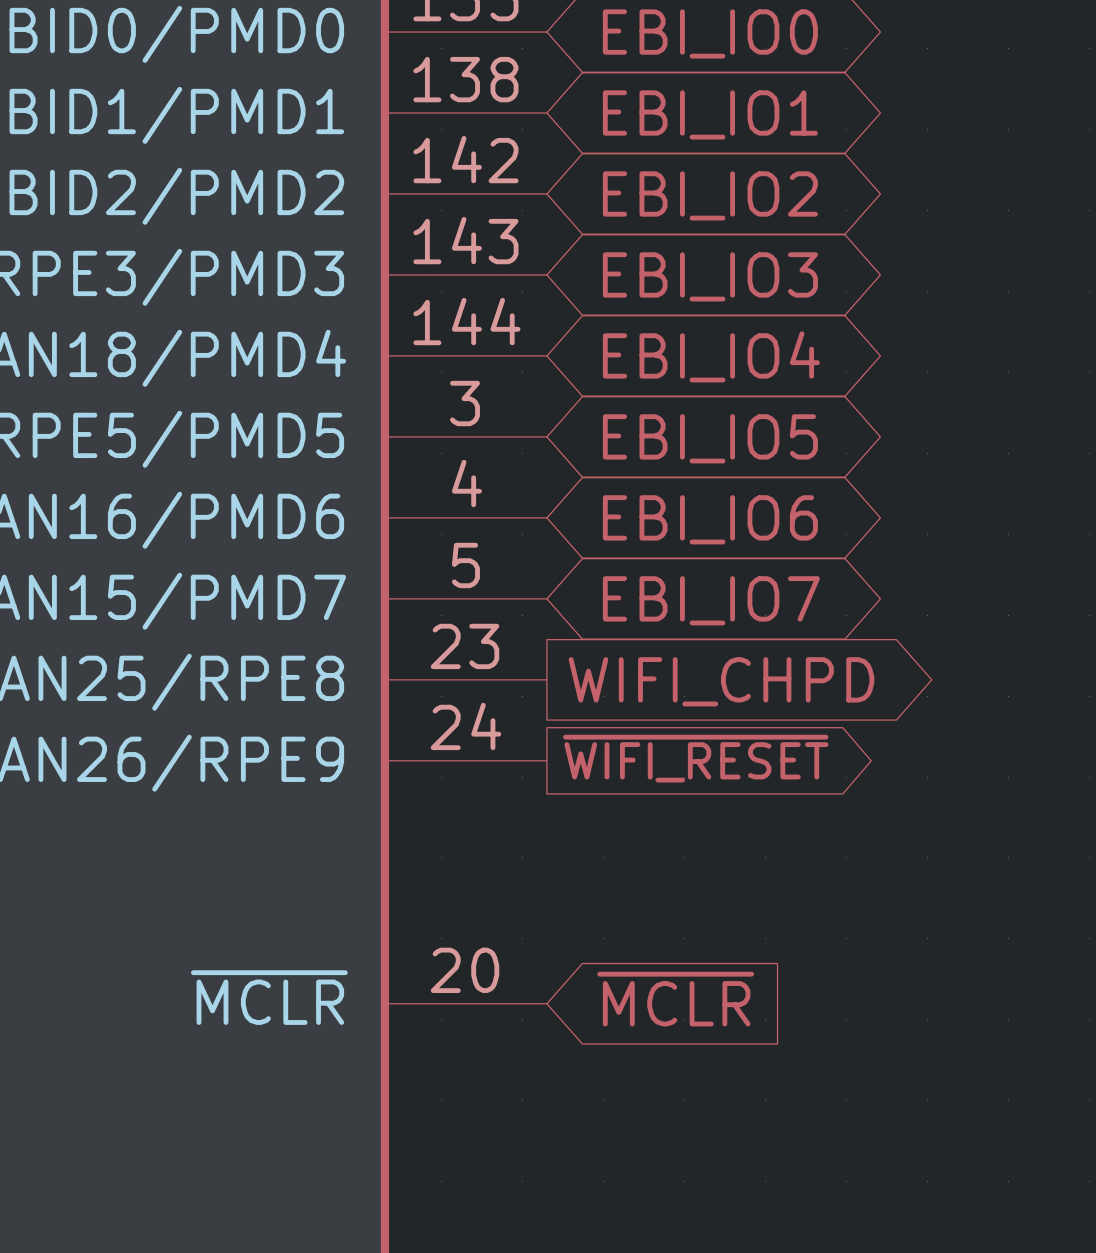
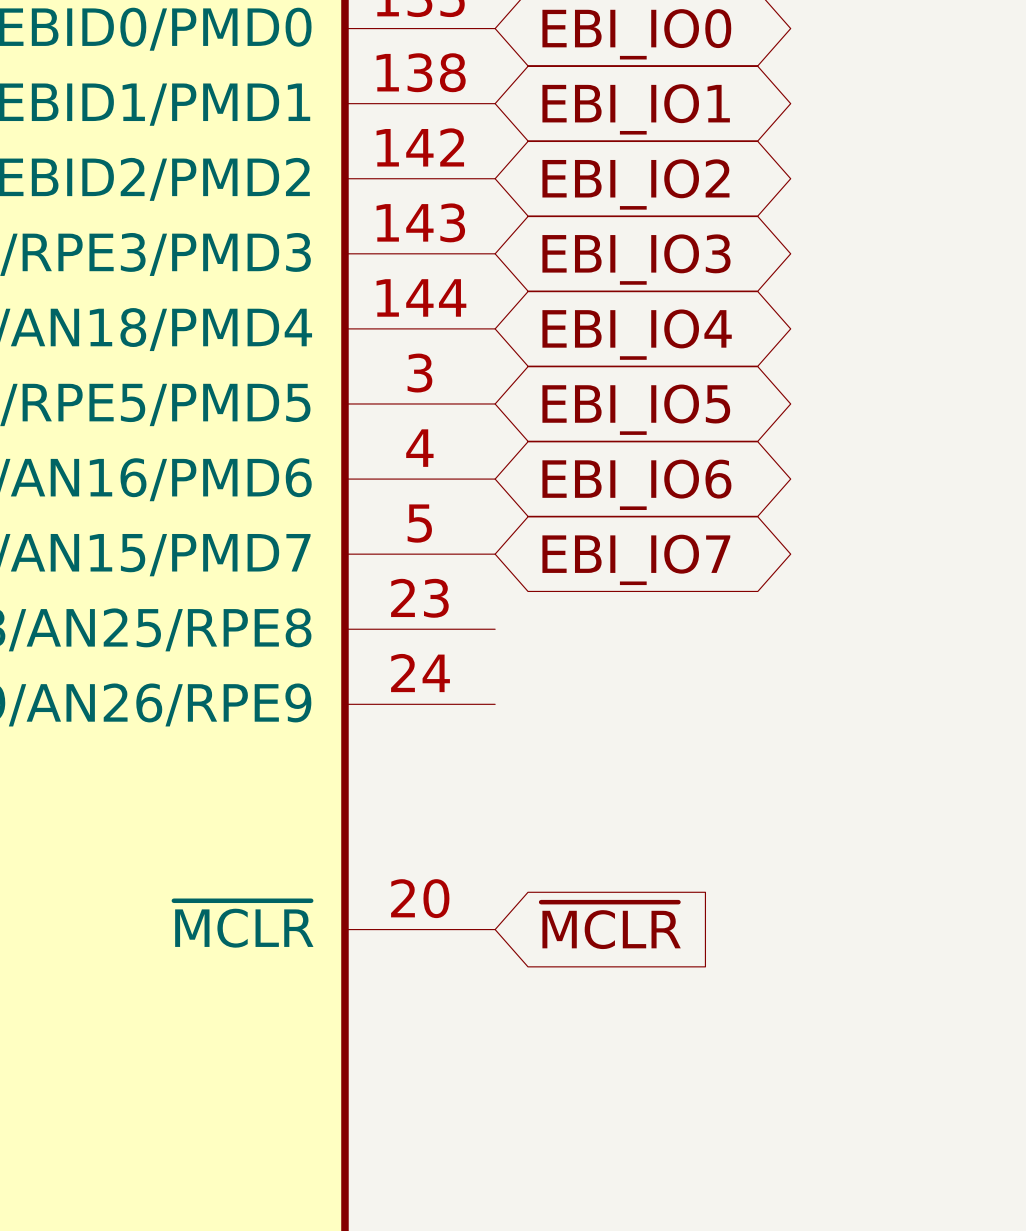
global label: WIFI_CHPD (721, 681) -> none
global label: ~{WIFI_RESET} (695, 758) -> none

